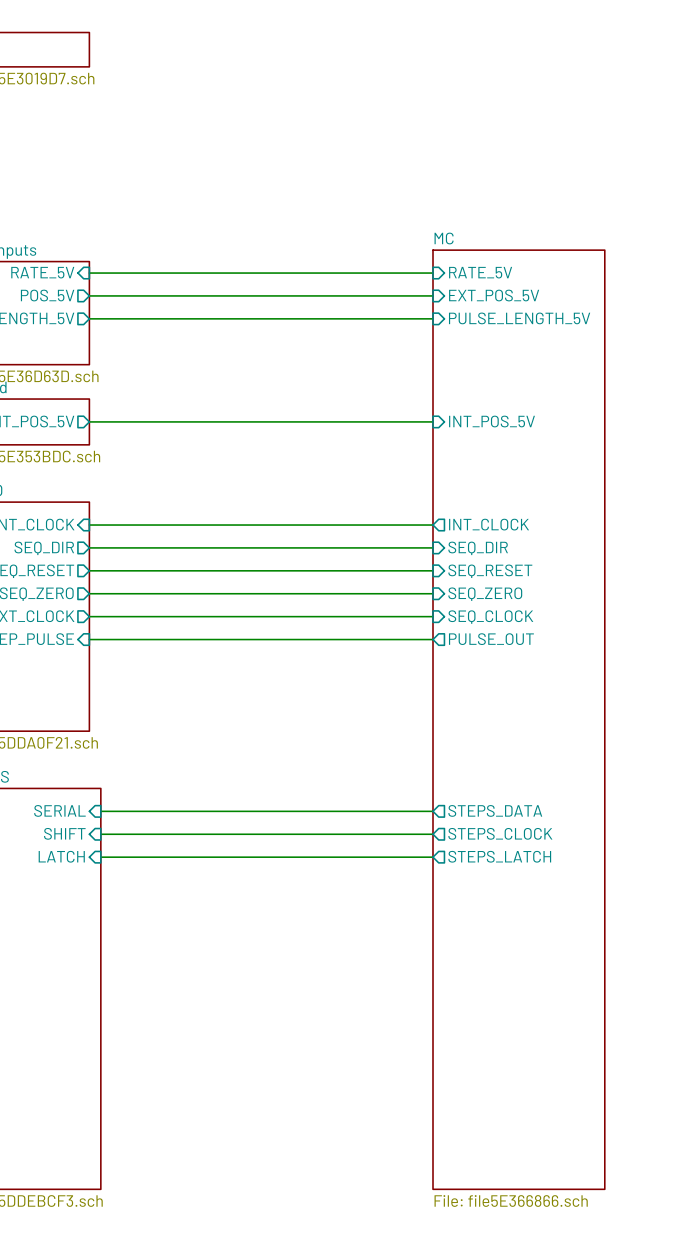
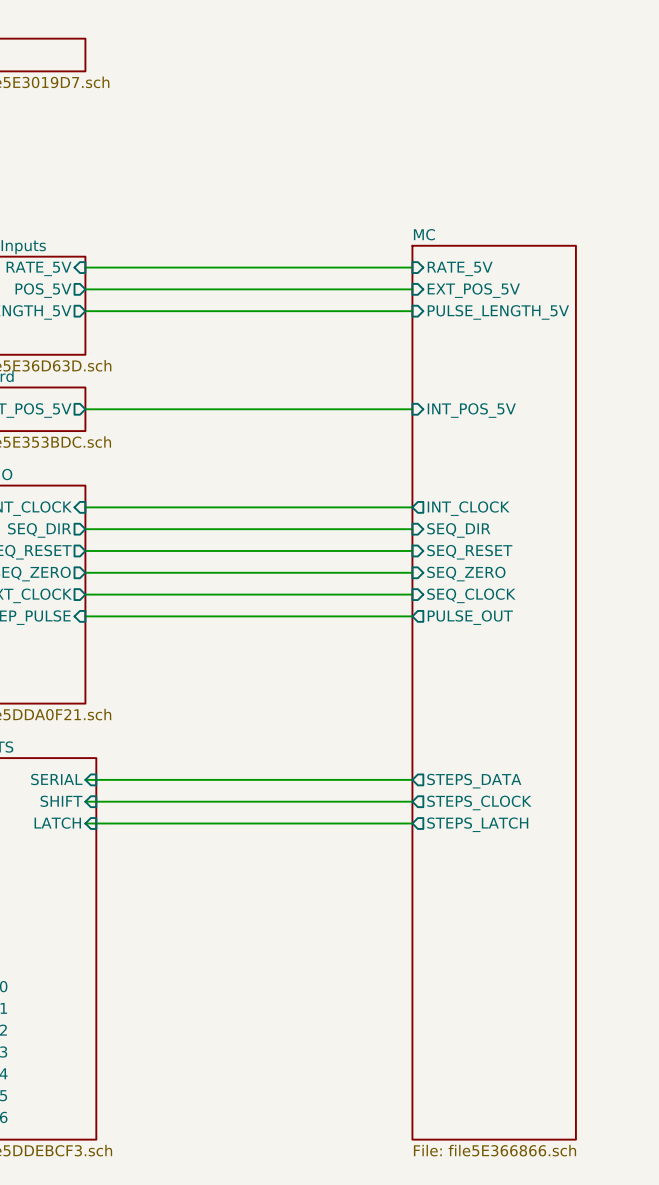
wire: none -> (85, 779) (96, 779)
wire: none -> (85, 801) (96, 801)
wire: none -> (85, 823) (96, 823)

